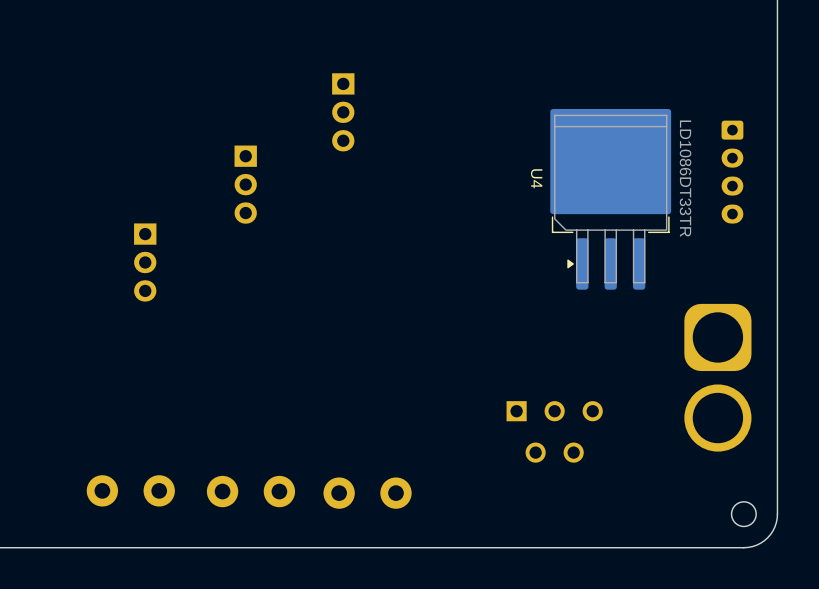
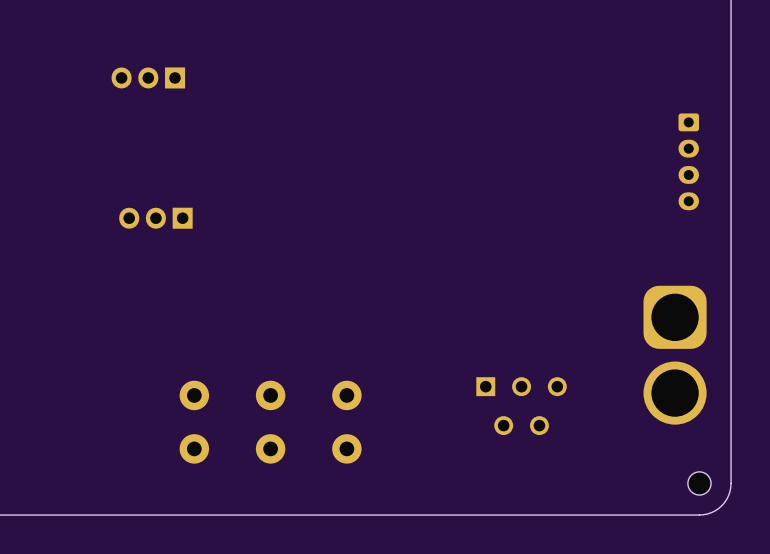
part: none -> (148, 77)
part: (343, 112) -> none
part: (245, 184) -> none
U4: LD1086DT33TR (610, 199) -> none
part rotation: 0° (145, 262) -> 90° clockwise (155, 218)
part: none -> (194, 422)
part: none -> (270, 422)
part: (130, 490) -> none
part: (250, 491) -> none
part rotation: 0° (367, 493) -> 90° clockwise (346, 422)

